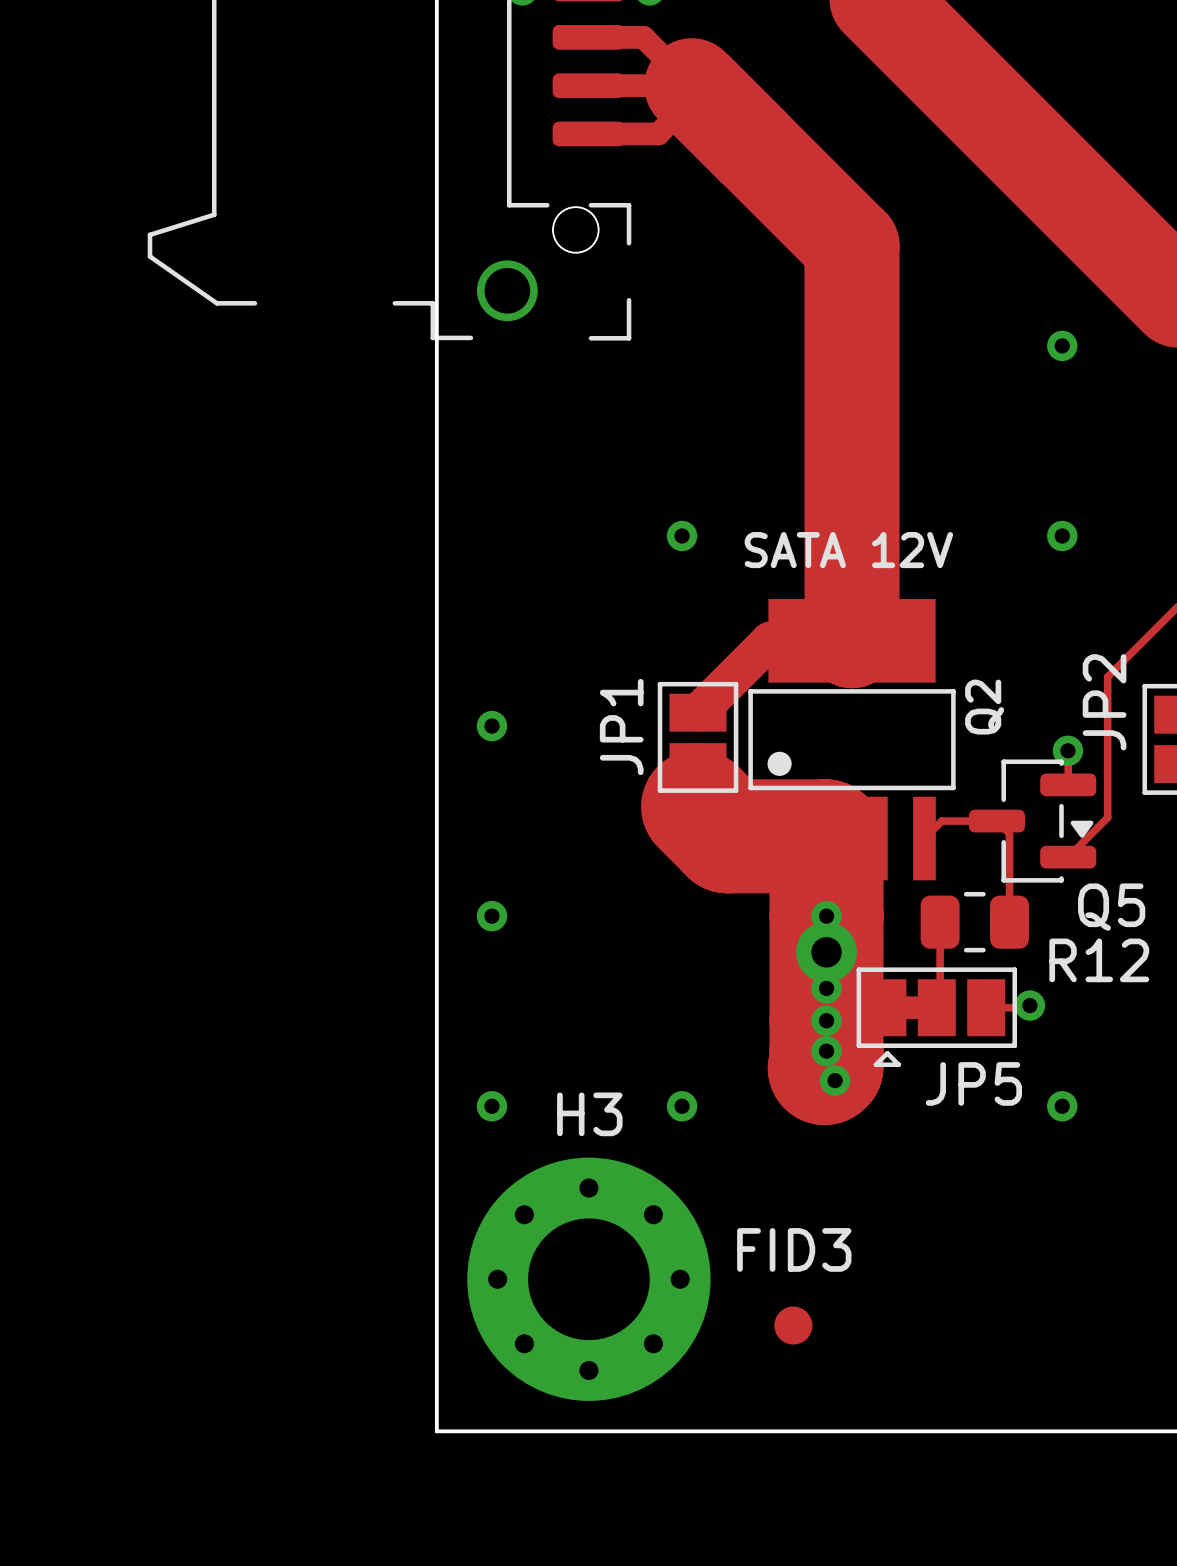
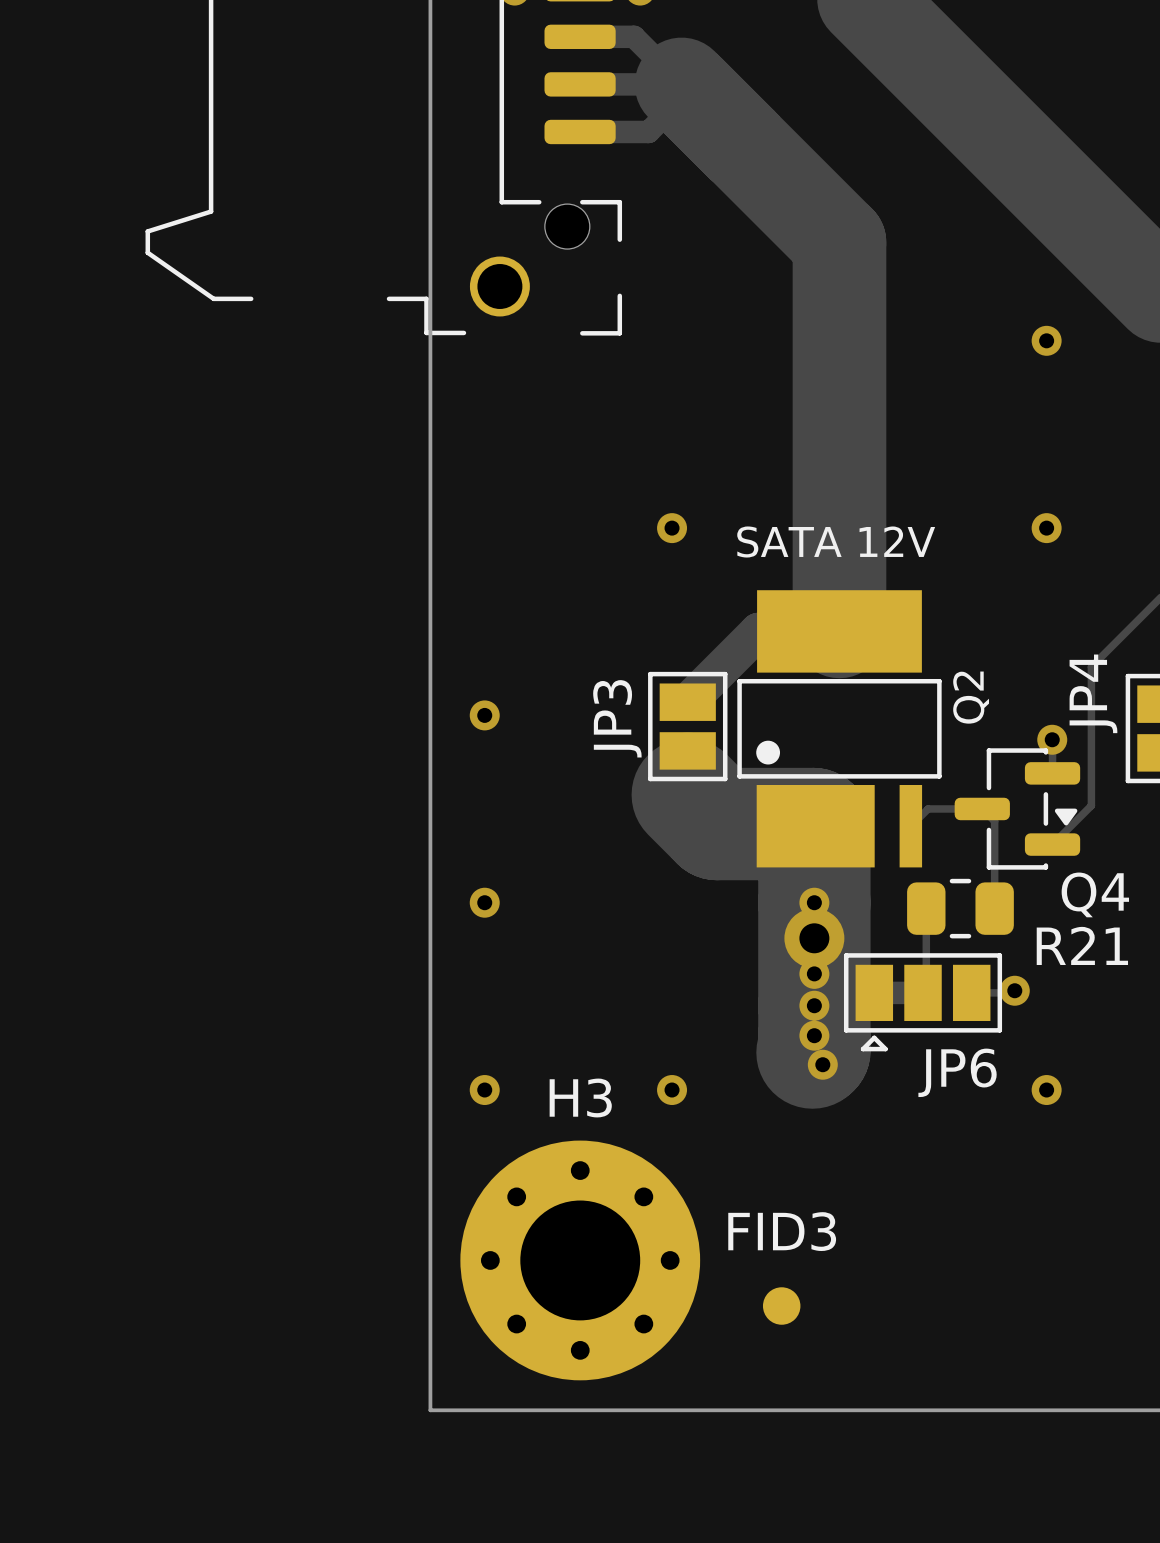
JP2 name: JP2 (1104, 702) -> JP4 (1093, 693)
JP1 name: JP1 (621, 727) -> JP3 (617, 718)
Q5 name: Q5 (1111, 907) -> Q4 (1095, 894)
R12 name: R12 (1099, 960) -> R21 (1082, 945)
JP5 name: JP5 (973, 1083) -> JP6 (957, 1072)

